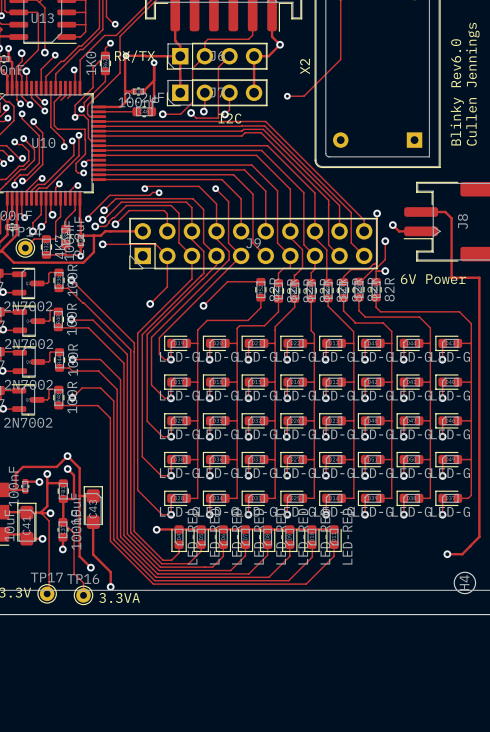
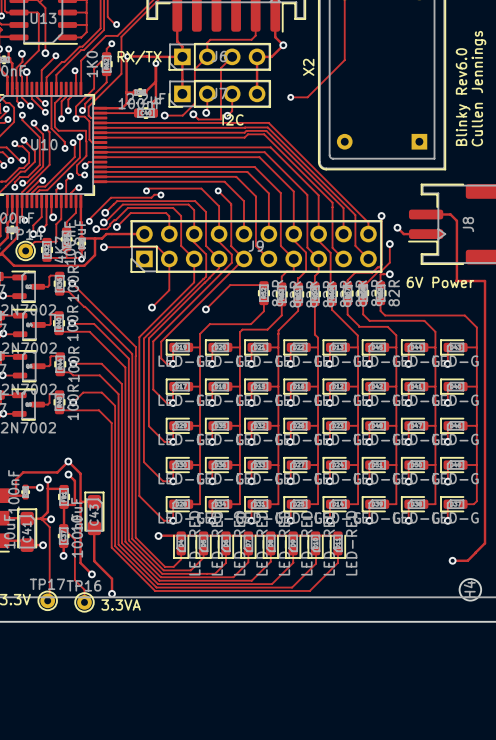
track: none -> (68, 99) (68, 110)
track: none -> (61, 101) (61, 118)
via: none -> (68, 110)
via: none -> (61, 118)
track: none -> (45, 127) (49, 132) (49, 164) (22, 192) (22, 200)
via: none -> (45, 127)
track: none -> (70, 176) (66, 180) (66, 200)
via: none -> (70, 176)

